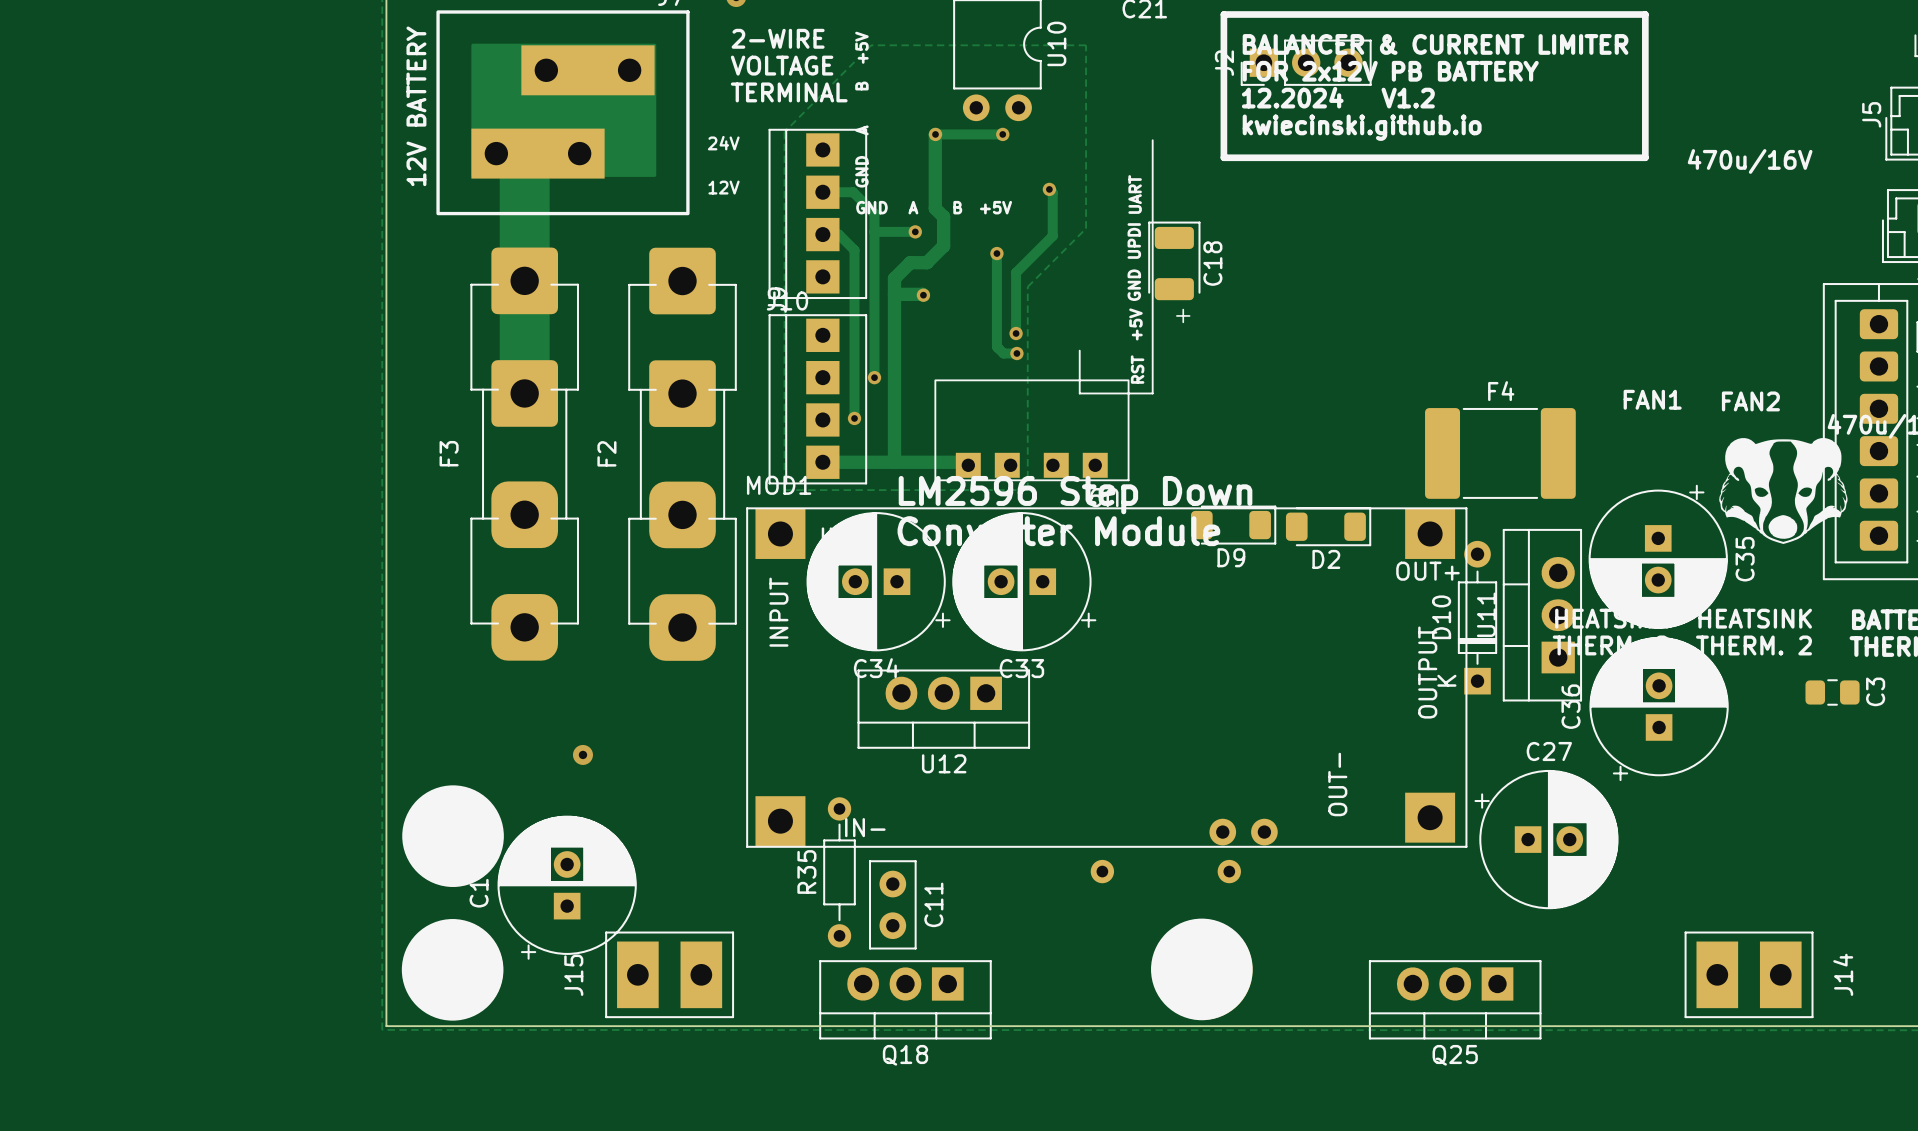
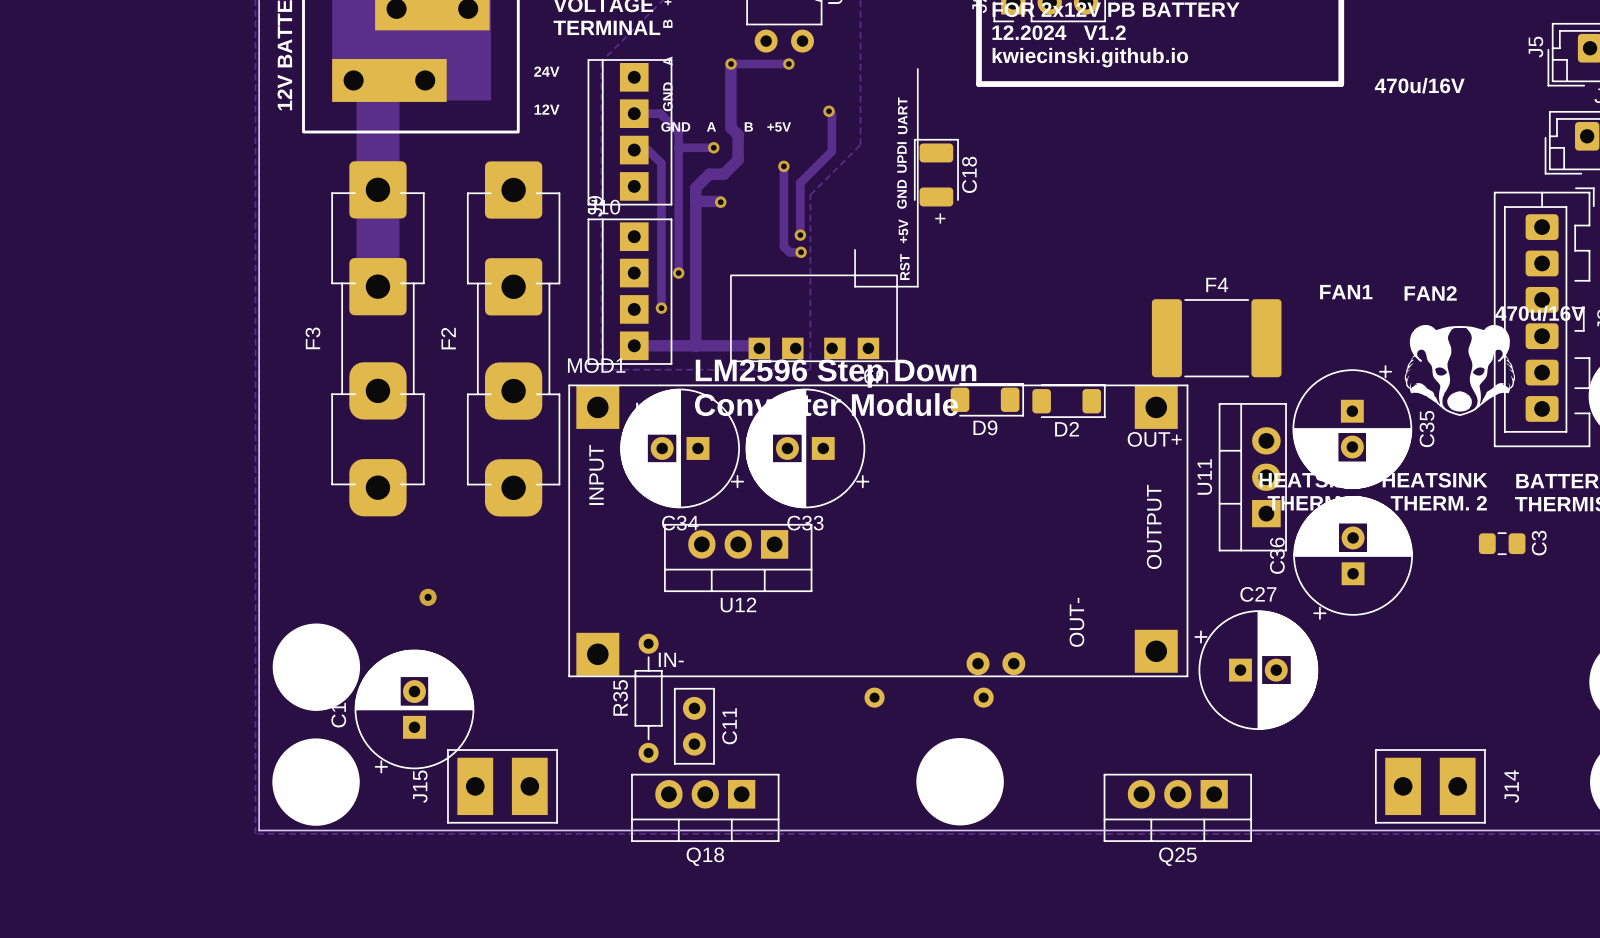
D10: (1477, 617) -> none

